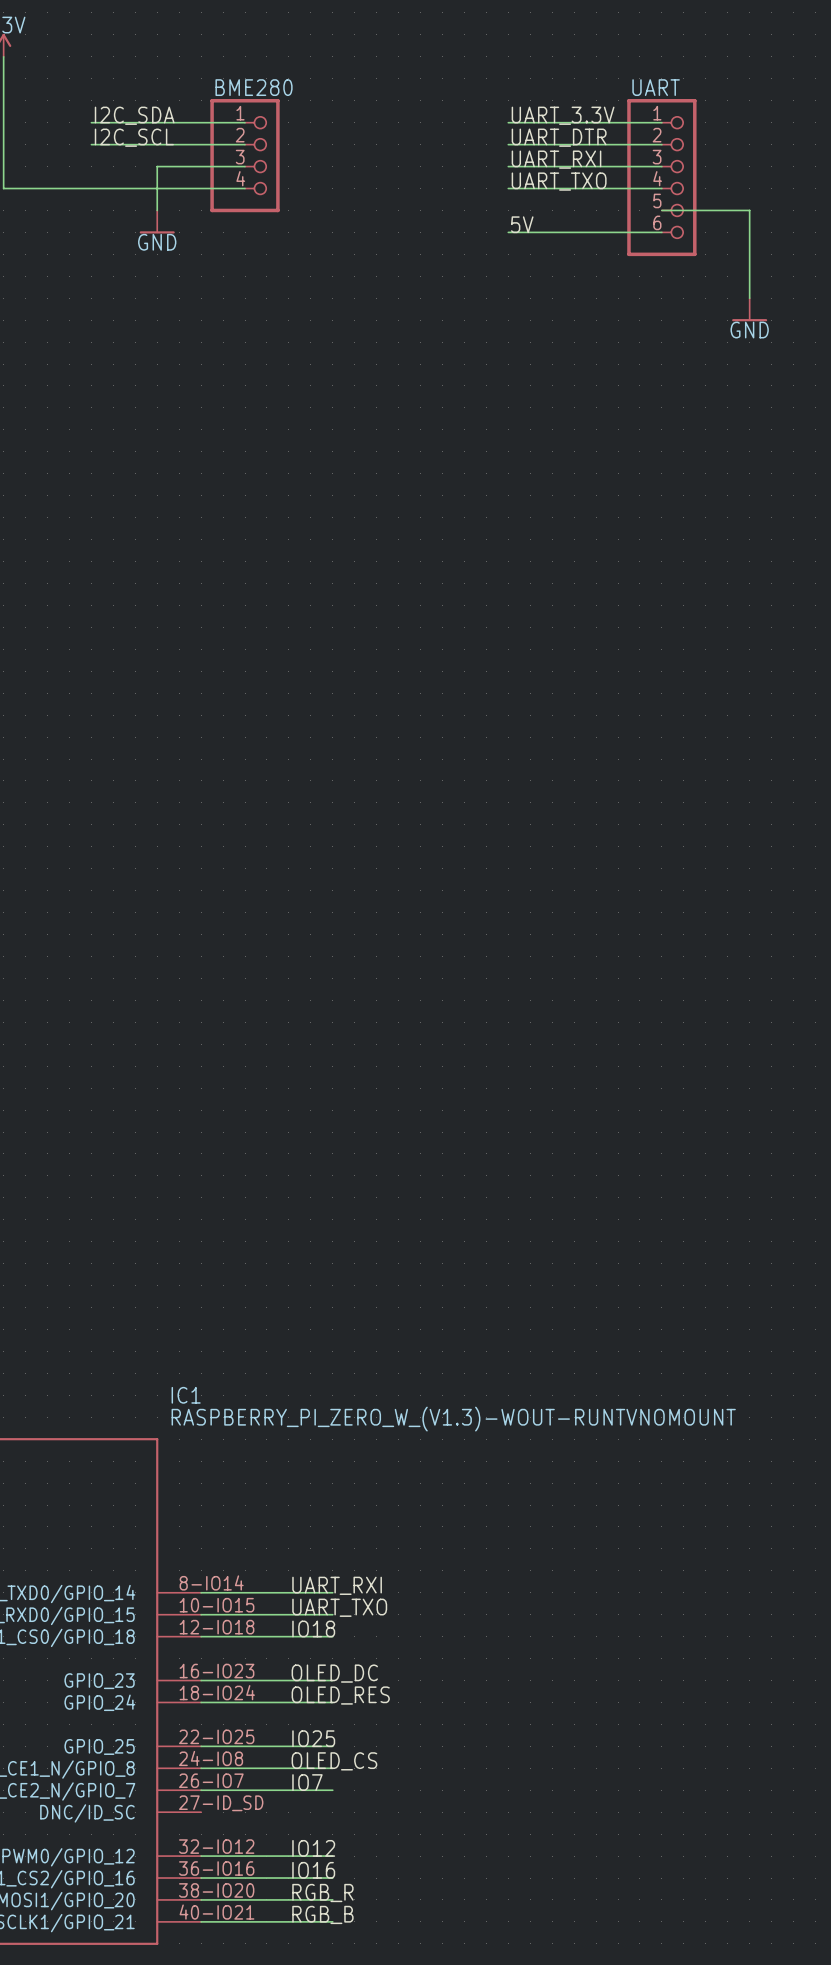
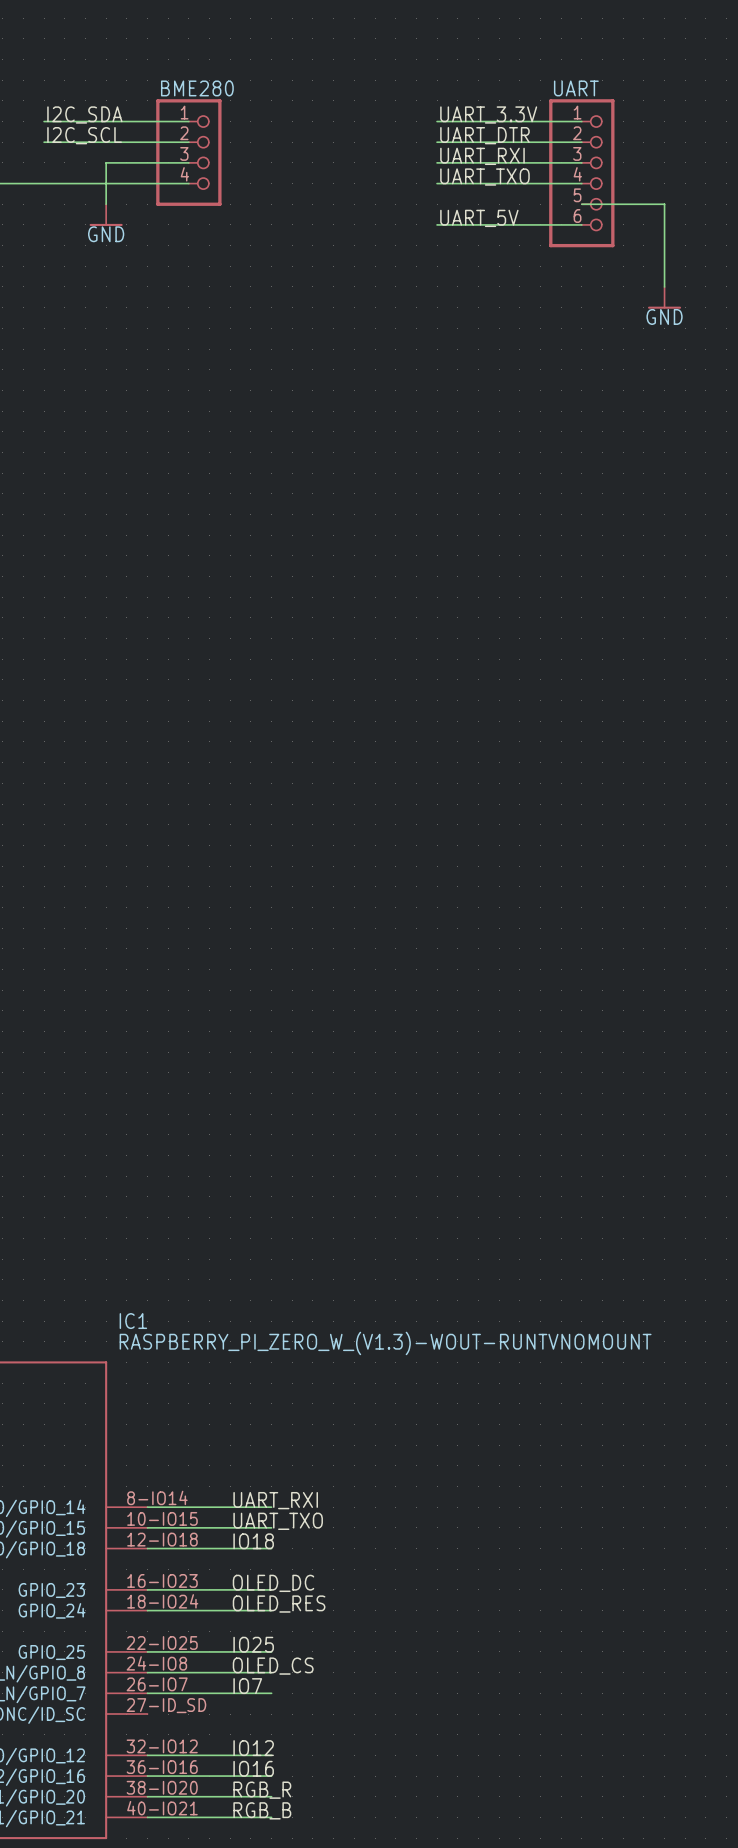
label: 5V (522, 224) -> UART_5V (479, 218)

